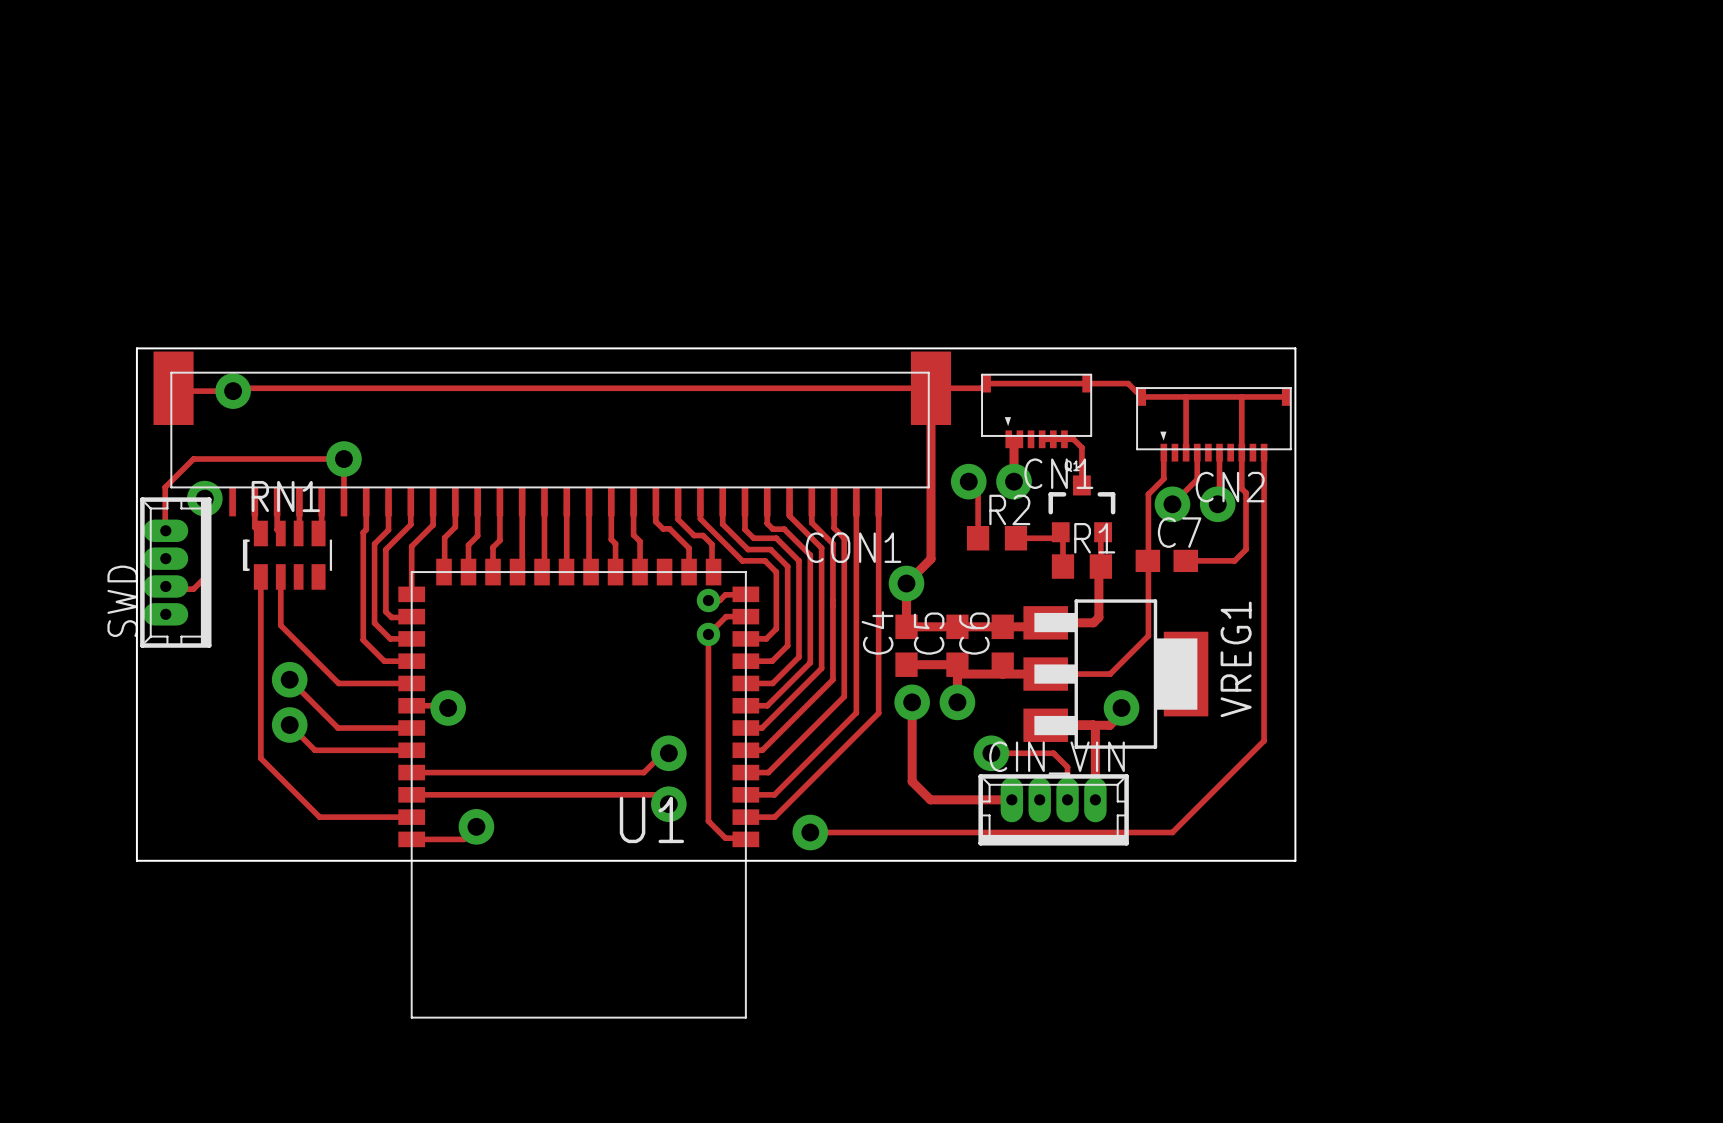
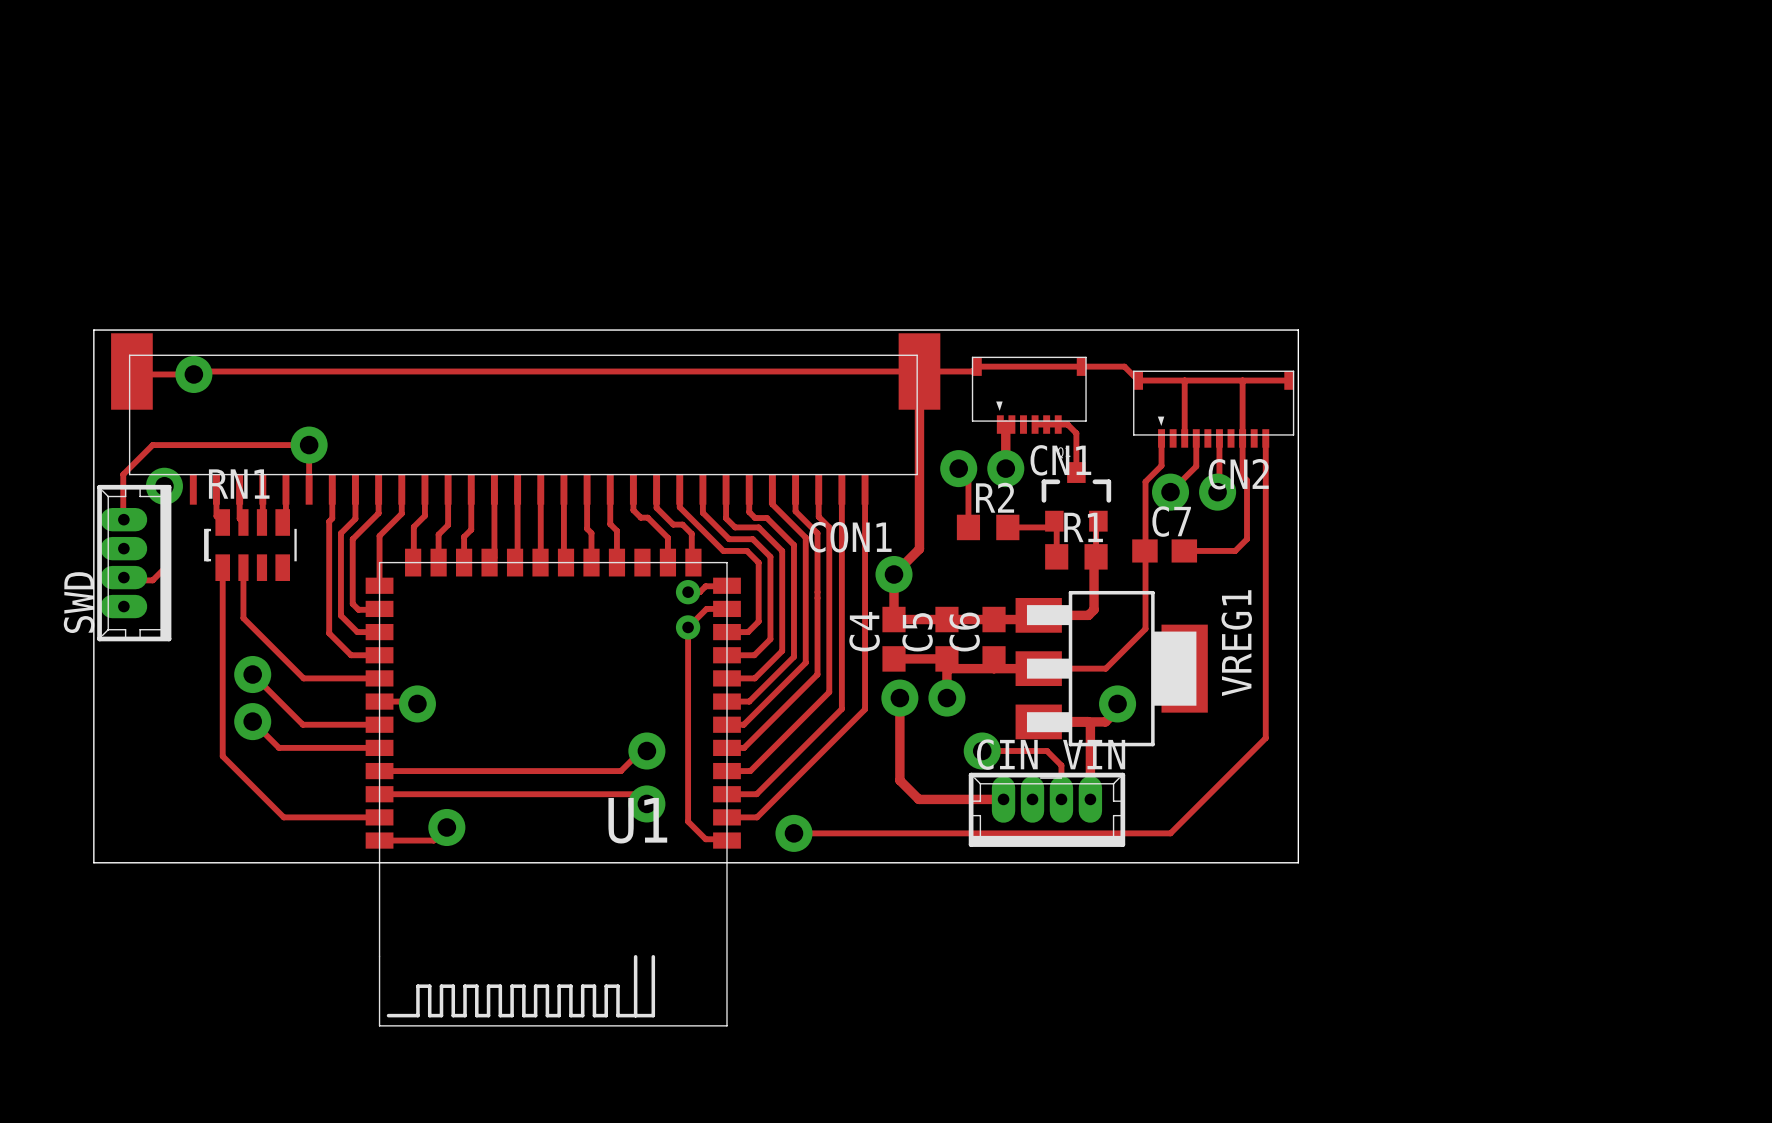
U1 footprint: [398, 558, 760, 1018] -> [365, 548, 741, 1026]

